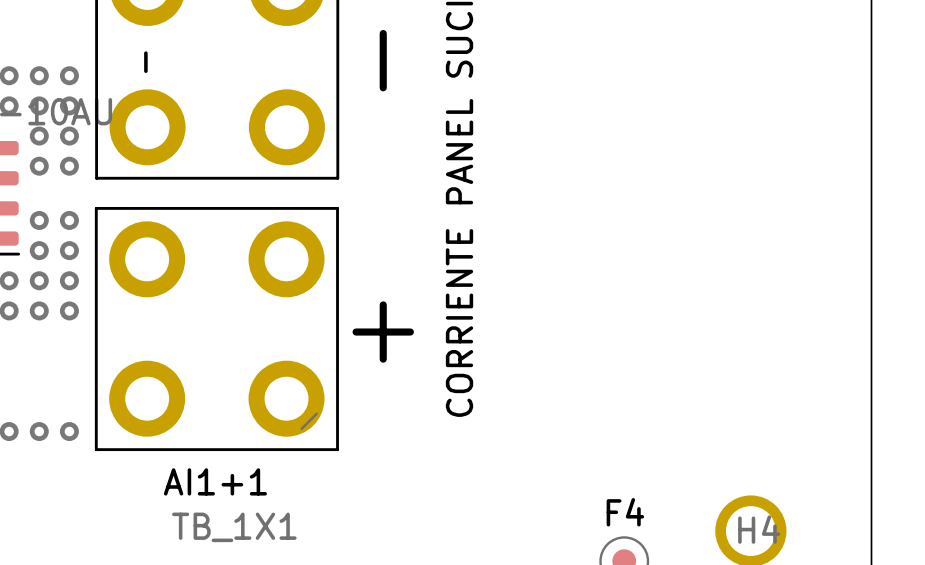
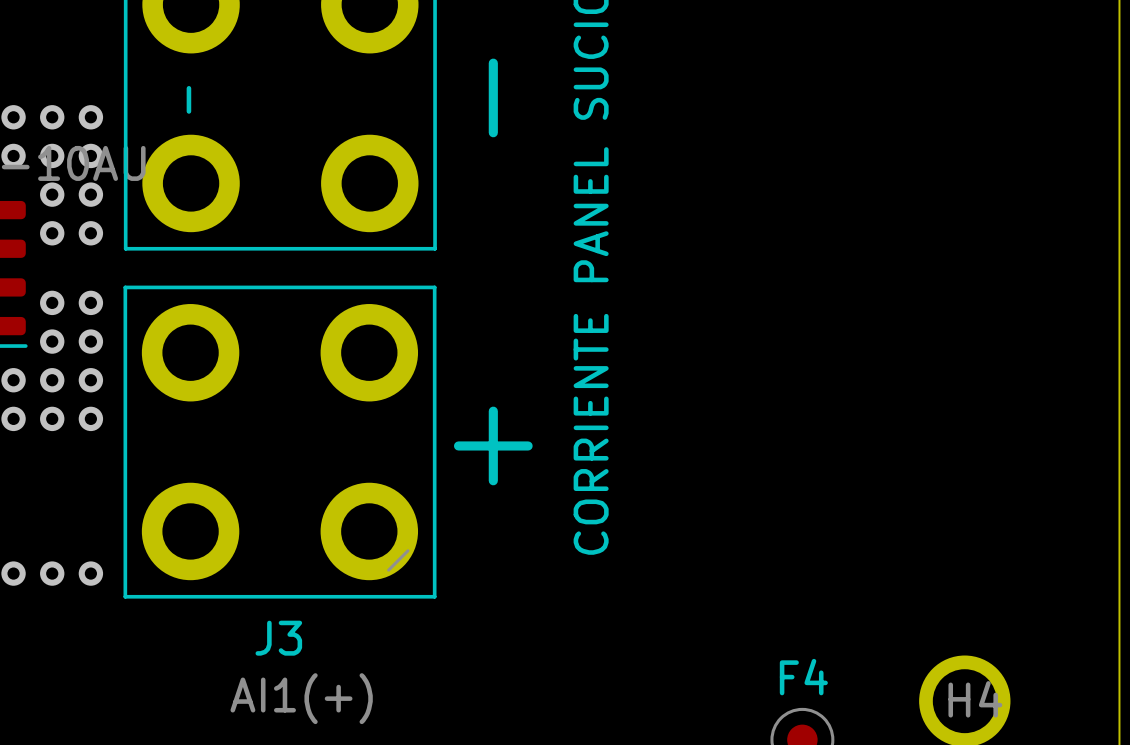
AI1+1 name: AI1+1 (215, 481) -> J3 (278, 638)
AI1+1 value: TB_1X1 (234, 527) -> AI1(+) (301, 698)

